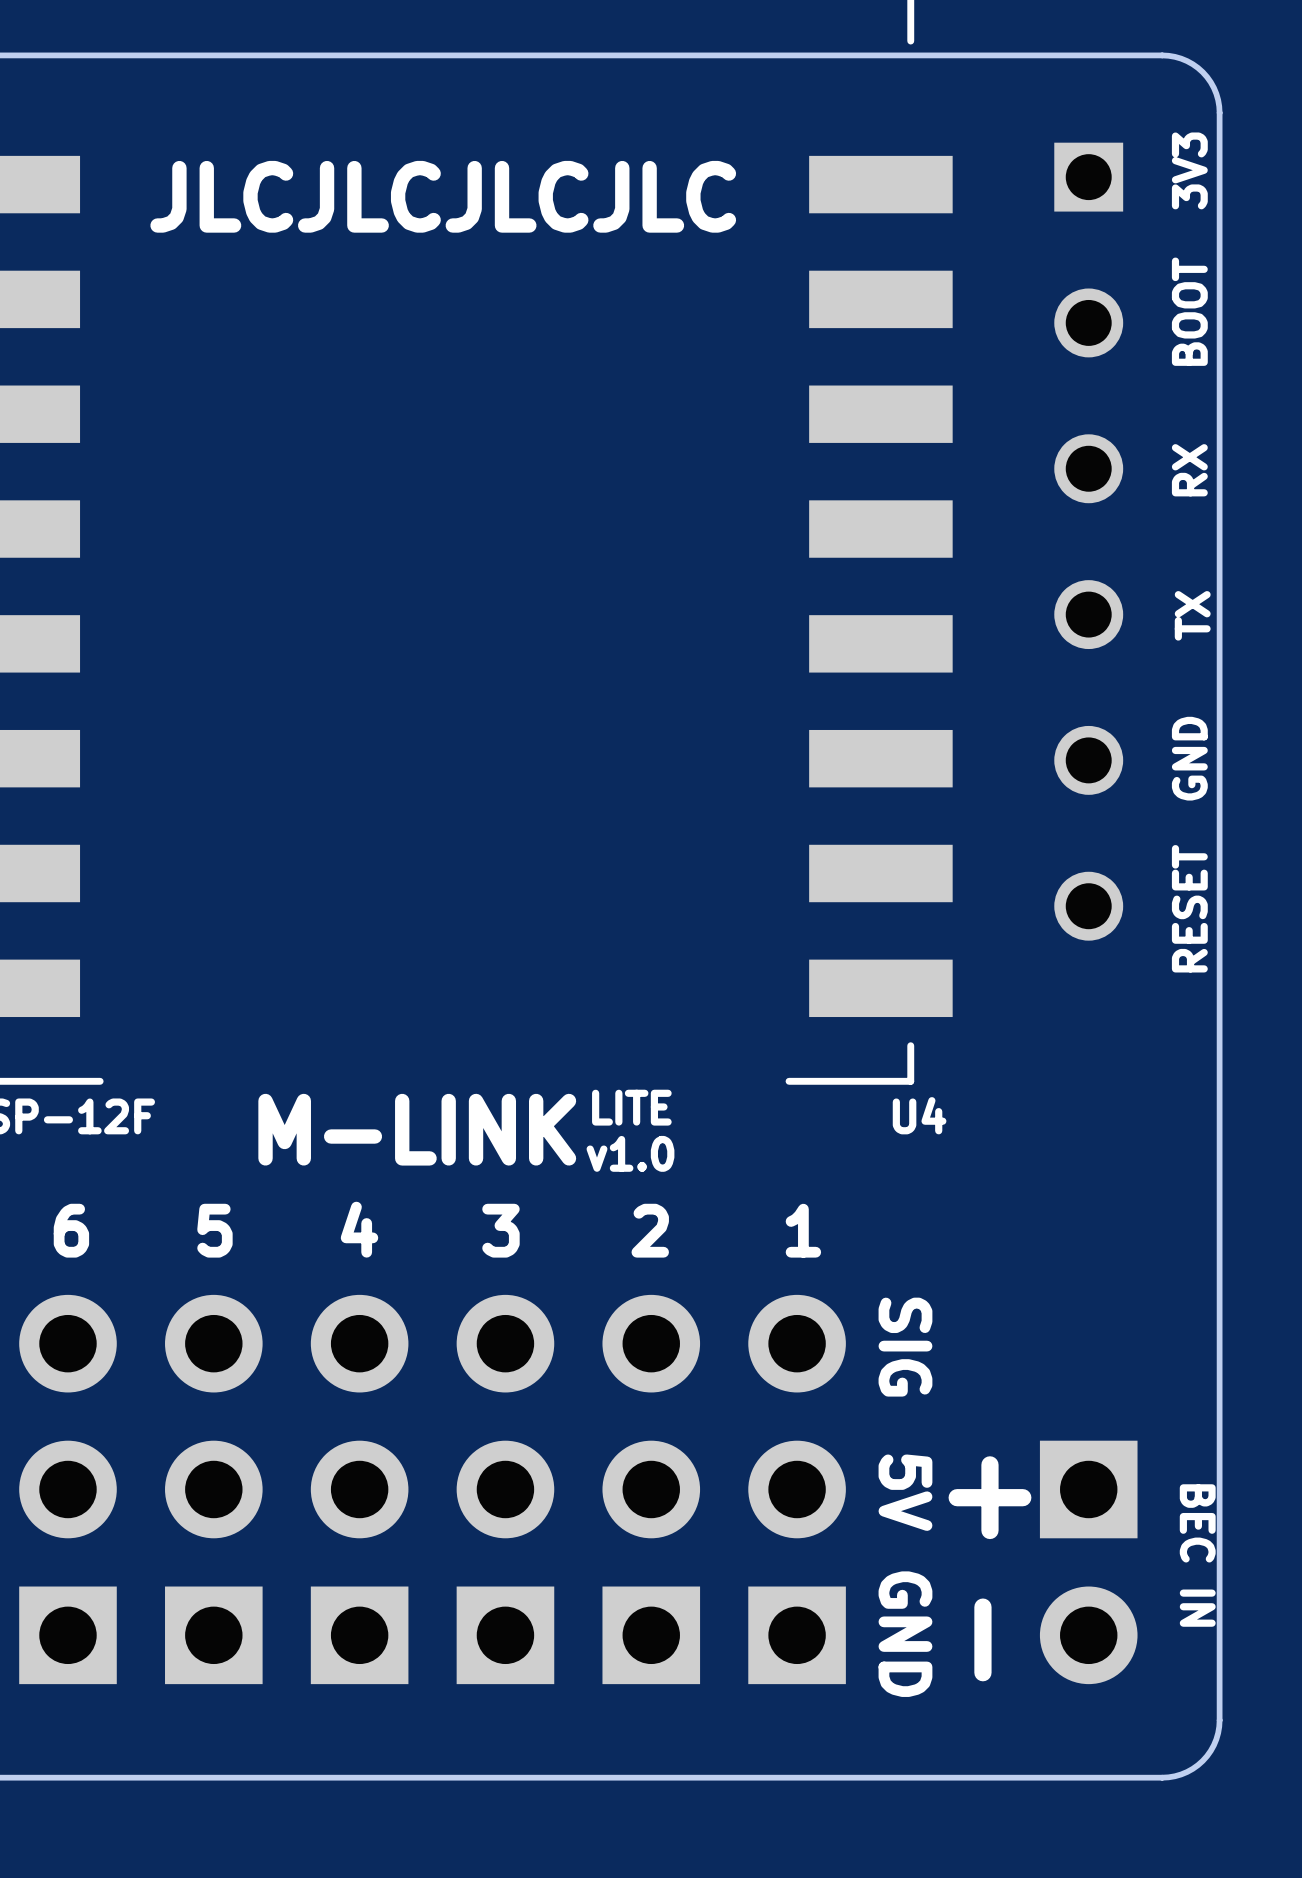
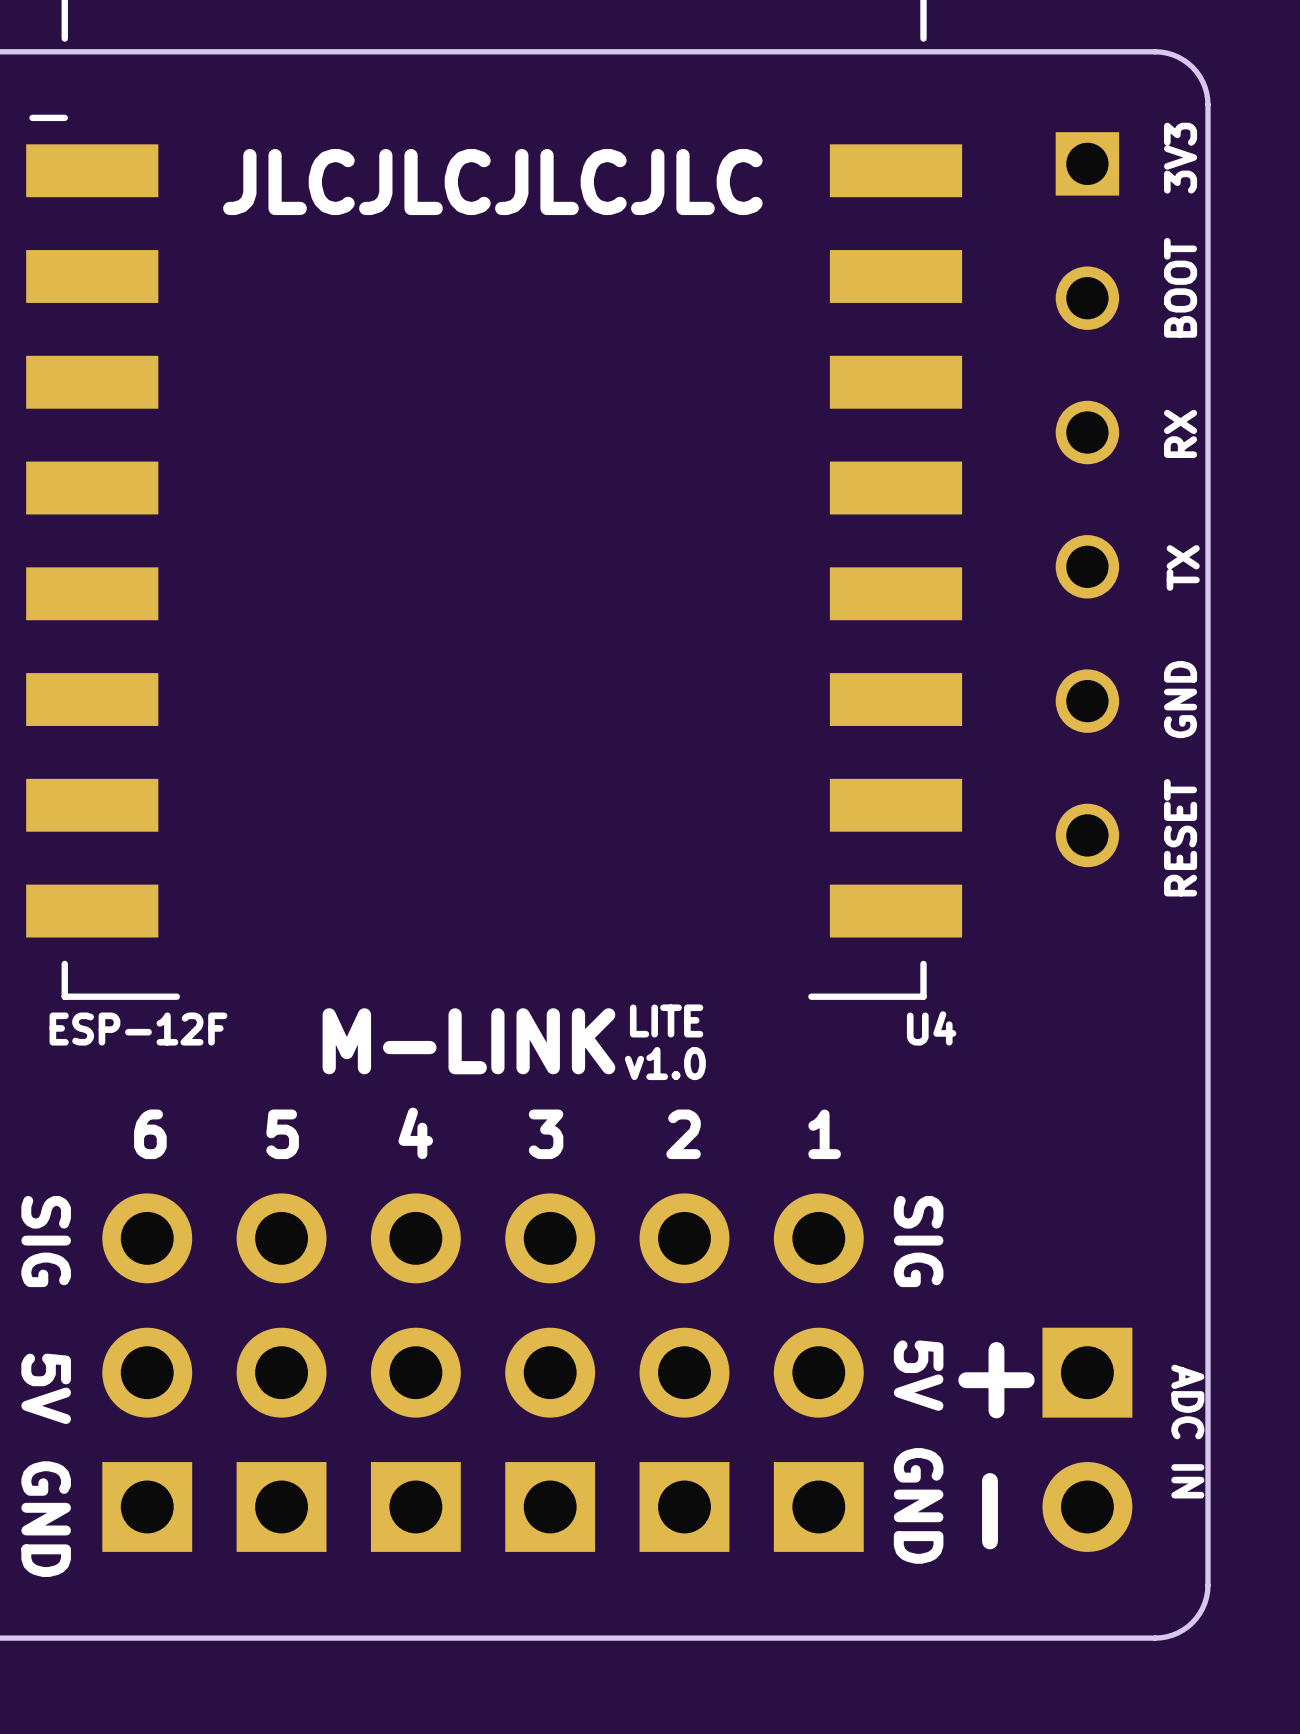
part value: BEC IN (1197, 1555) -> ADC IN (1187, 1431)

